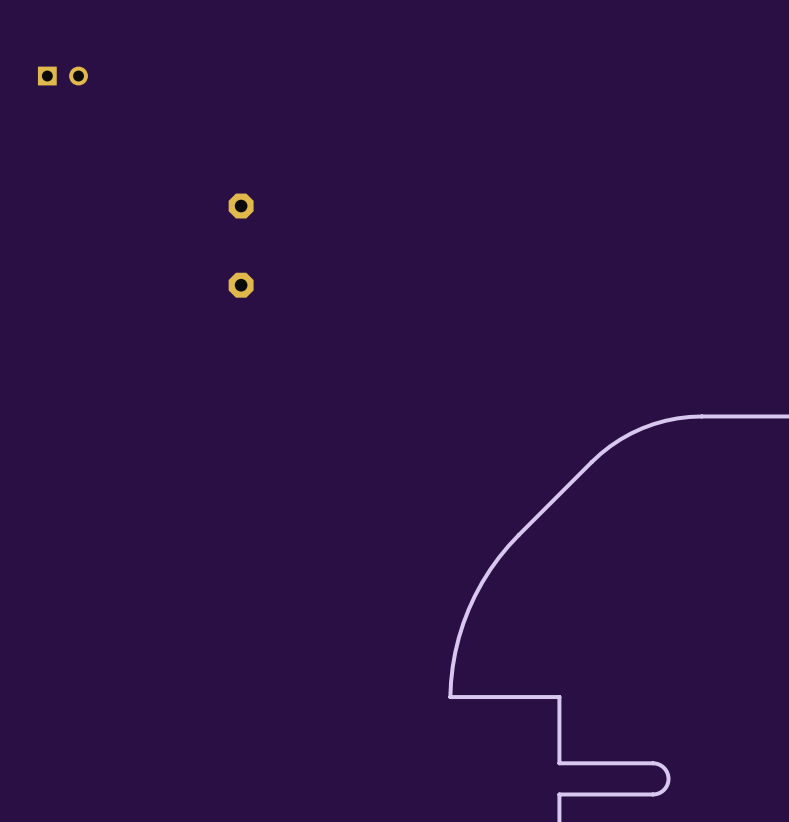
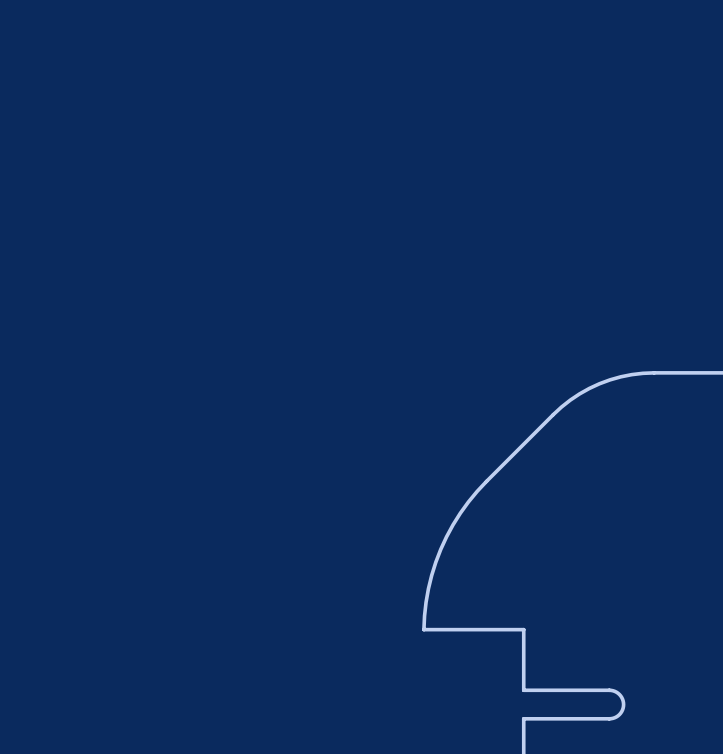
part: (62, 76) -> none
part: (241, 206) -> none
part: (241, 285) -> none

